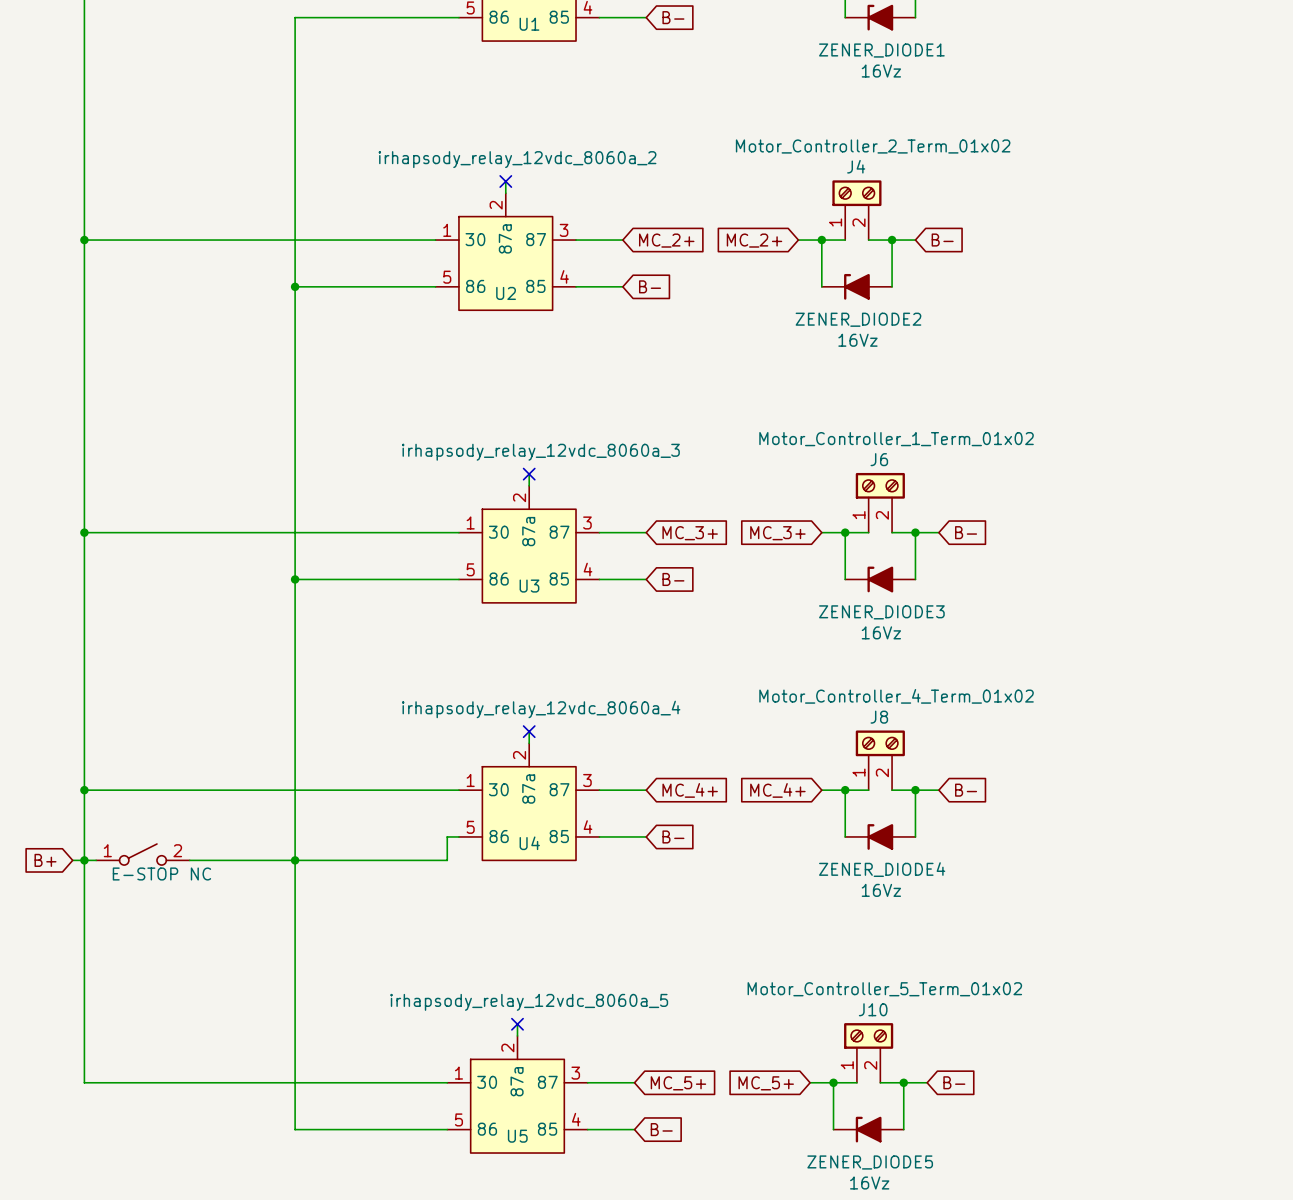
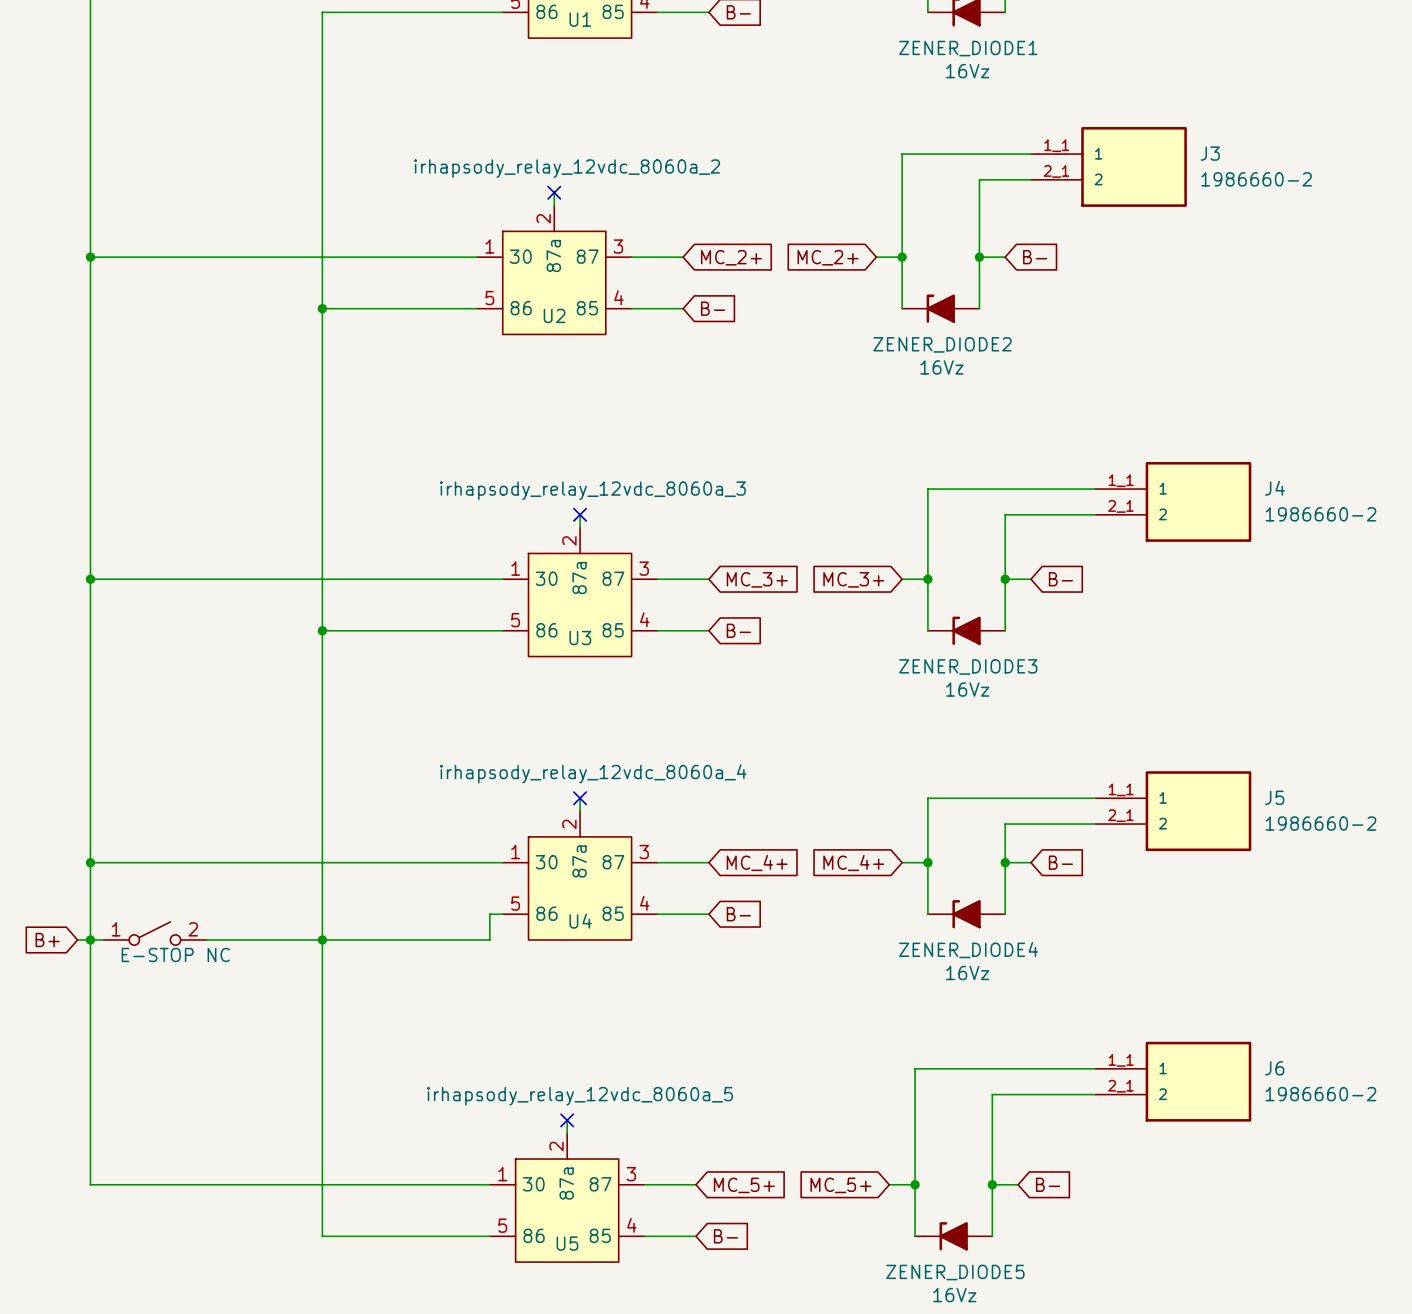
J4 value: Motor_Controller_2_Term_01x02 (873, 146) -> 1986660-2 (1320, 514)
J3: none -> 1986660-2 (1108, 166)
J4 name position: J4 (856, 166) -> J4 (1274, 488)
J4 symbol: [832, 180, 882, 241] -> [1095, 461, 1252, 542]
wire: (821, 240) (845, 240) -> (902, 257) (902, 154) (1030, 154)
wire: (868, 240) (892, 240) -> (1030, 179) (979, 179) (979, 257)
J6 value: Motor_Controller_1_Term_01x02 (896, 439) -> 1986660-2 (1320, 1094)
J6 name position: J6 (879, 459) -> J6 (1274, 1068)
J6 symbol: [855, 472, 905, 533] -> [1095, 1041, 1252, 1122]
wire: (845, 532) (868, 532) -> (927, 579) (927, 489) (1095, 489)
wire: (892, 532) (915, 532) -> (1095, 514) (1005, 514) (1005, 579)
J5: none -> 1986660-2 (1173, 811)
J8: Motor_Controller_4_Term_01x02 (880, 760) -> none
wire: (845, 790) (868, 790) -> (927, 862) (927, 798) (1095, 798)
wire: (892, 790) (915, 790) -> (1095, 824) (1005, 824) (1005, 862)
J10: Motor_Controller_5_Term_01x02 (868, 1052) -> none
wire: (833, 1082) (856, 1082) -> (915, 1184) (915, 1068) (1095, 1068)
wire: (880, 1082) (903, 1082) -> (1095, 1094) (992, 1094) (992, 1184)

